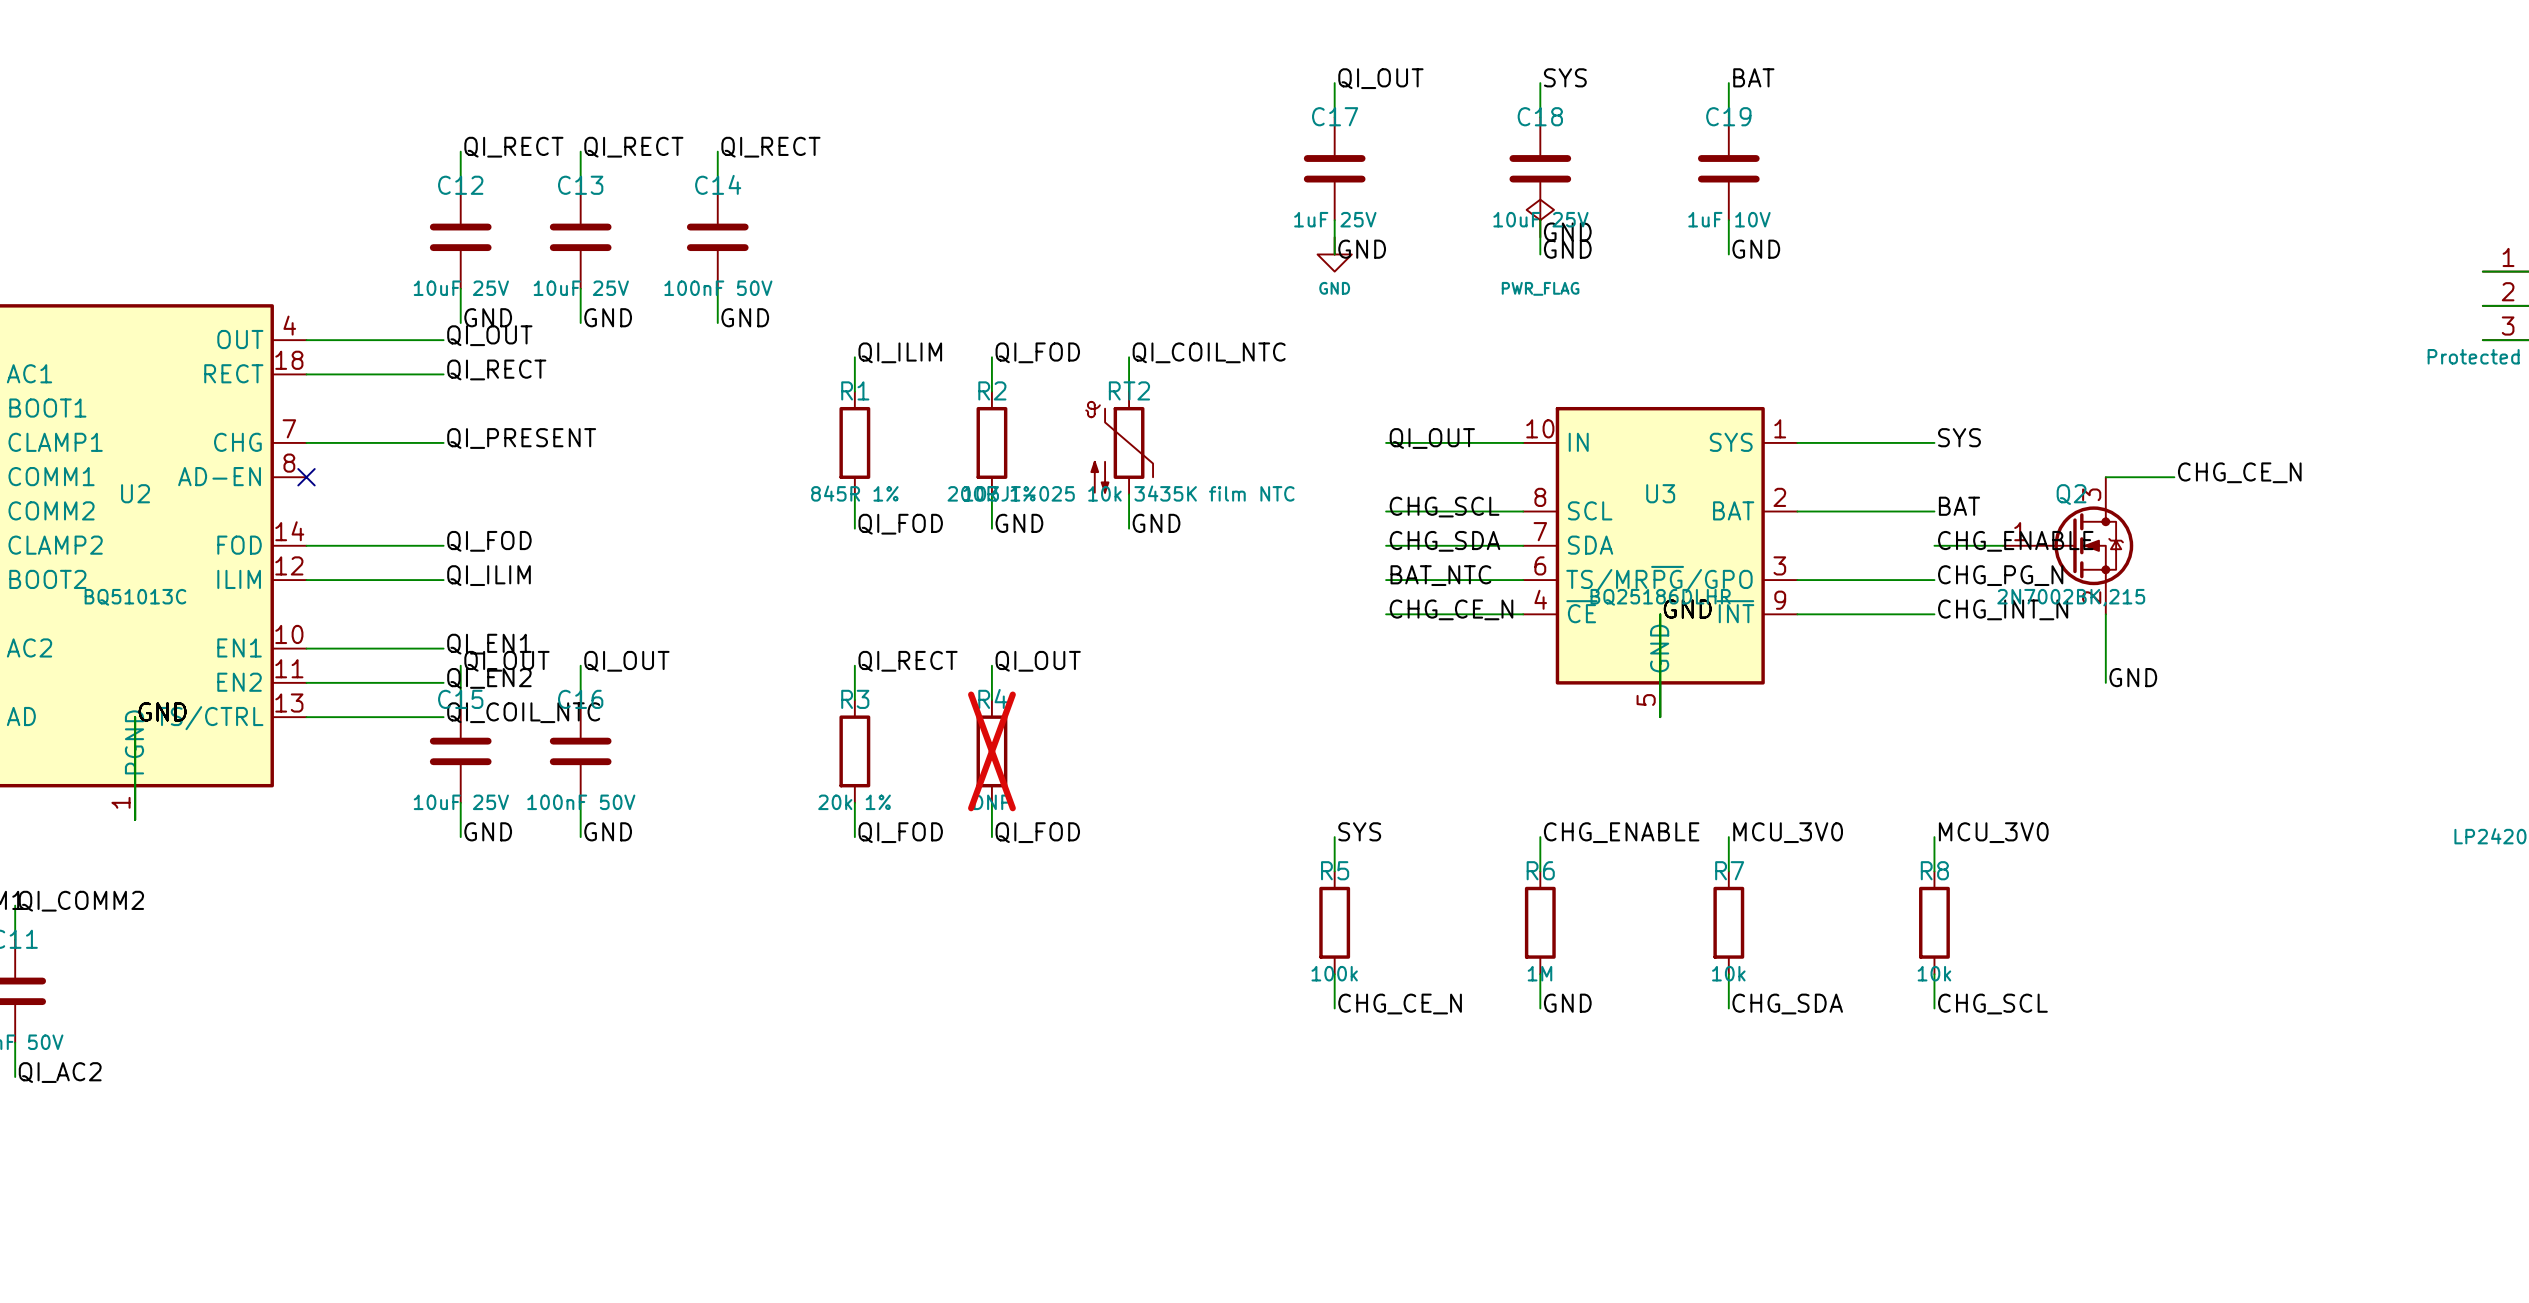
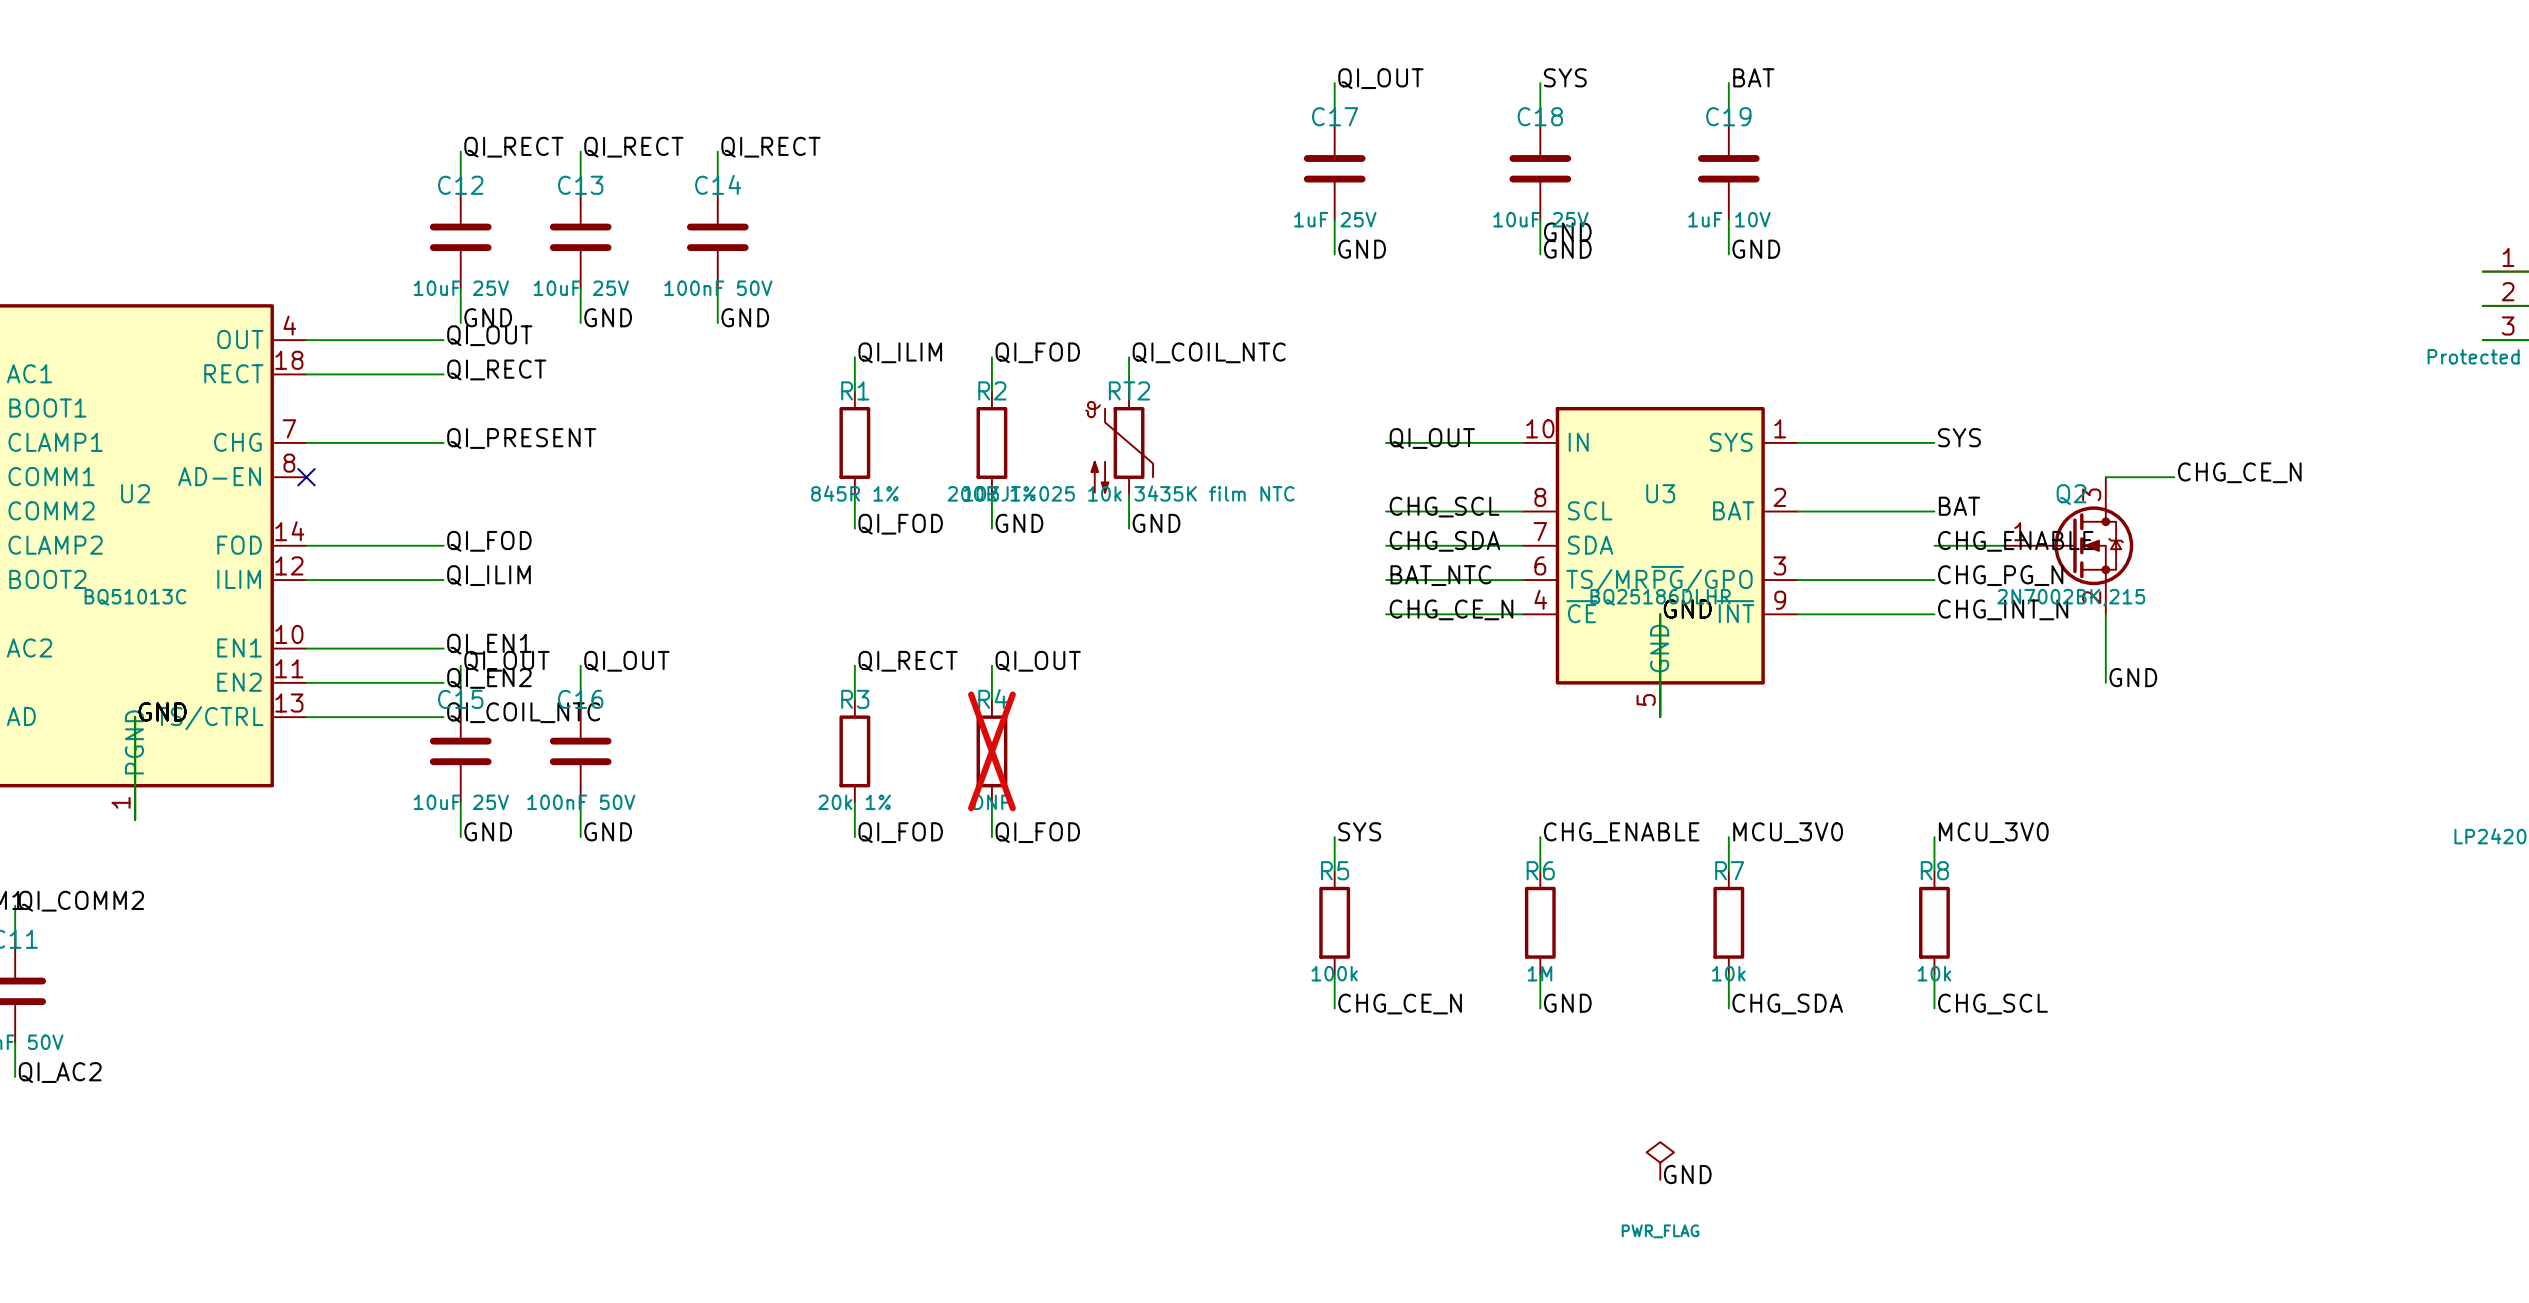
power symbol: PWR_FLAG (1540, 218) -> none
power symbol: GND (1334, 254) -> none
power symbol: none -> PWR_FLAG (1660, 1160)
label: none -> GND (1687, 1174)

